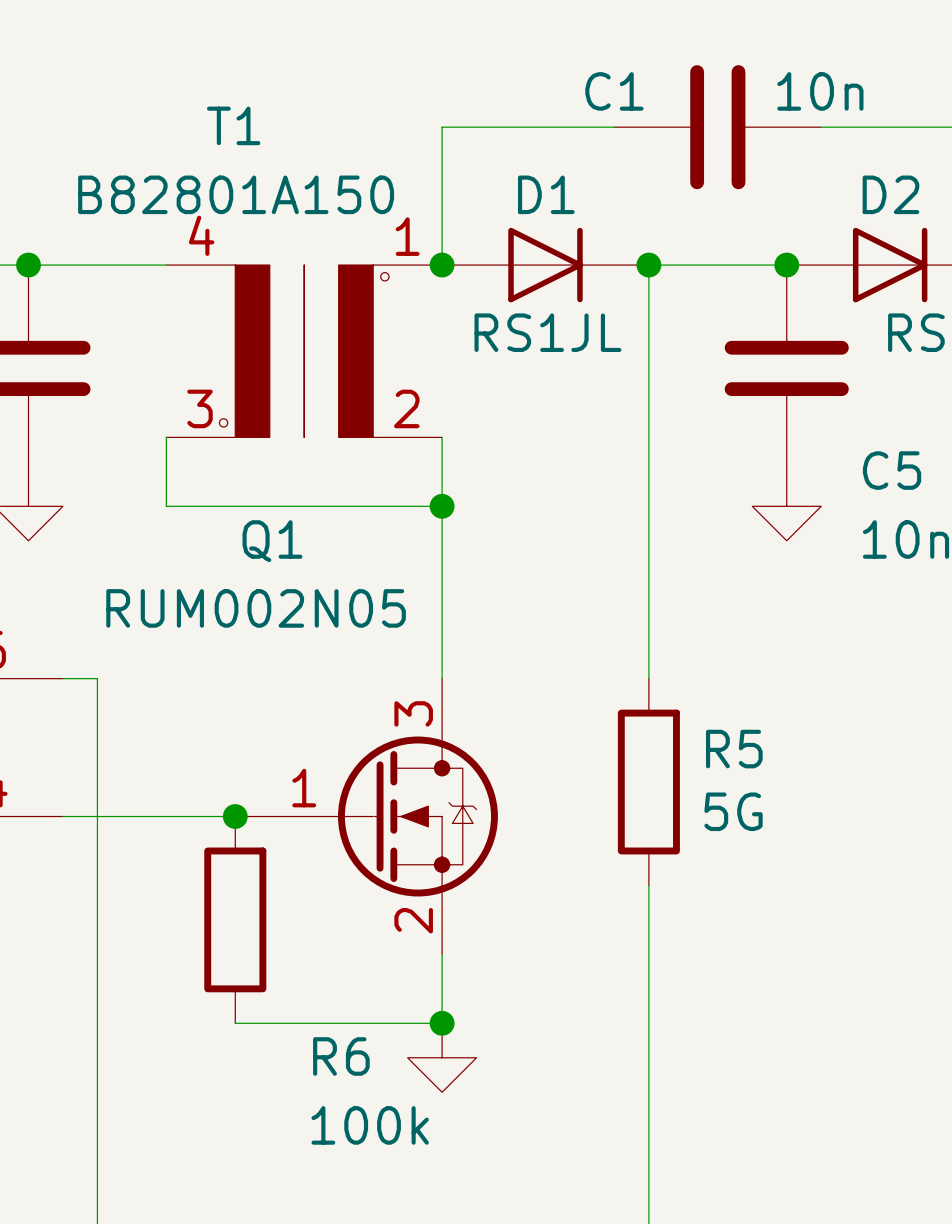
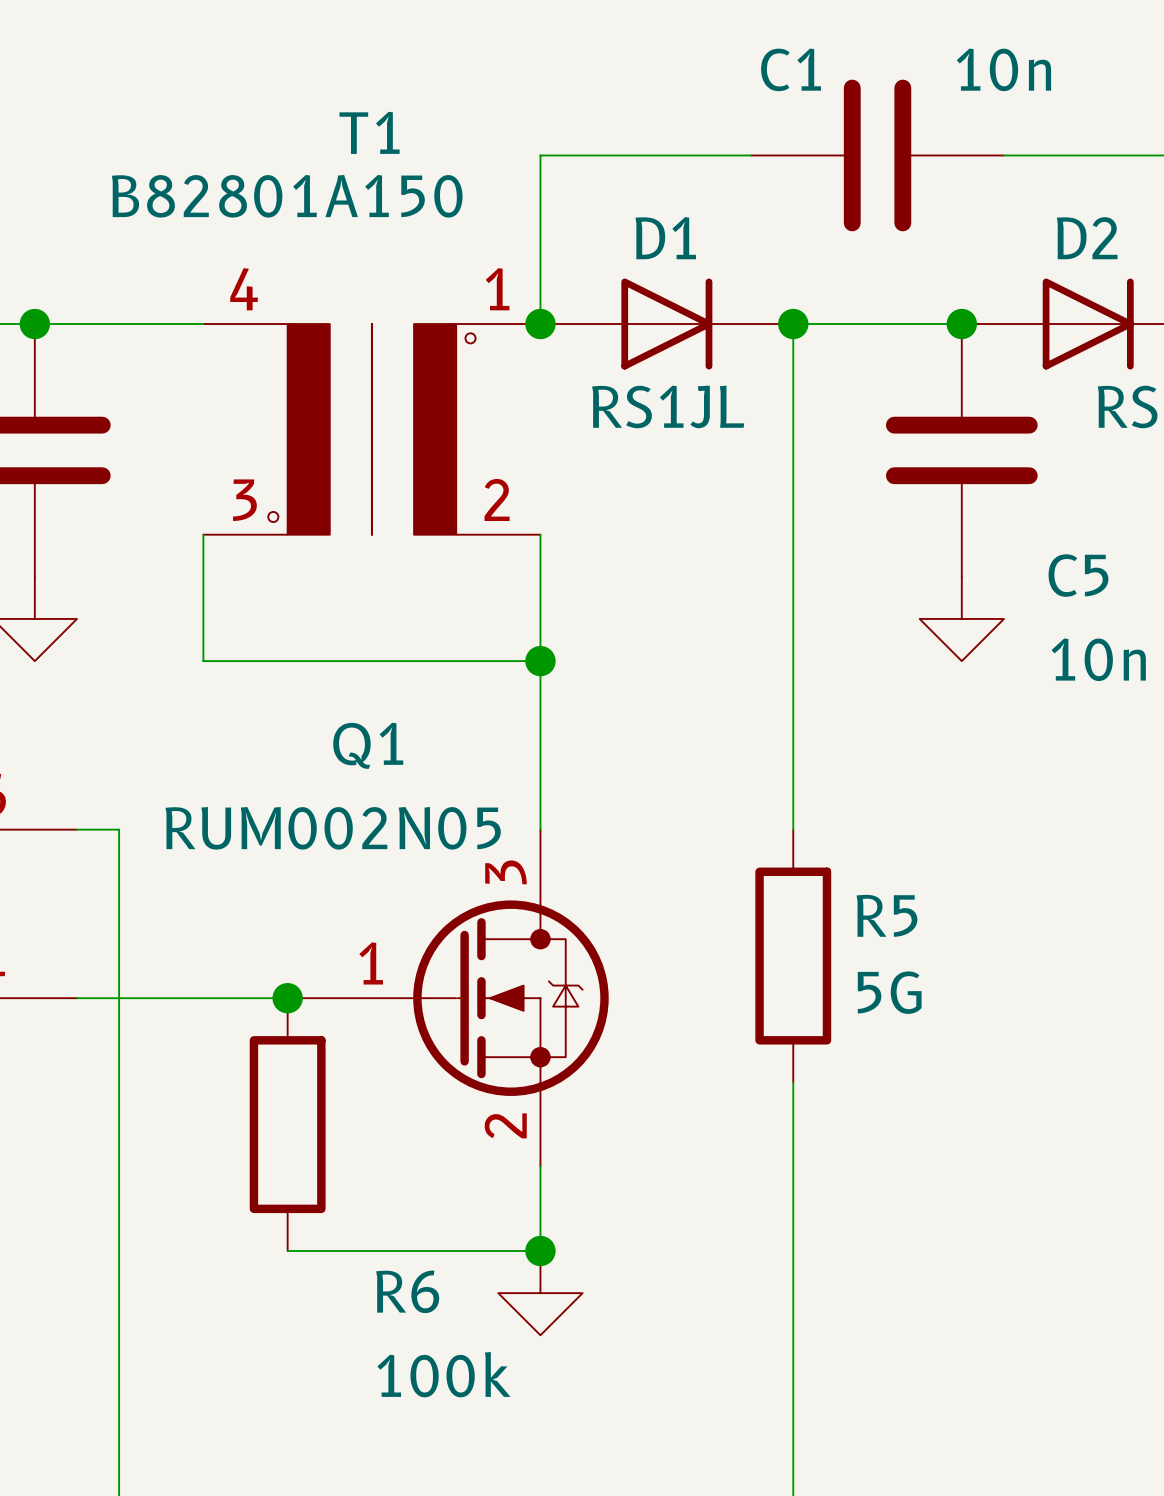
C1 name position: C1 (614, 91) -> C1 (791, 69)
C1 value position: 10n (820, 91) -> 10n (1003, 69)
T1 name position: T1 (233, 125) -> T1 (369, 132)
T1 value position: B82801A150 (236, 194) -> B82801A150 (287, 196)
wire: (166, 506) (442, 506) -> (203, 618) (203, 661) (540, 661)
junction position: (442, 506) -> (540, 661)
Q1 name position: Q1 (272, 541) -> Q1 (368, 745)
Q1 value position: RUM002N05 (256, 608) -> RUM002N05 (333, 828)

